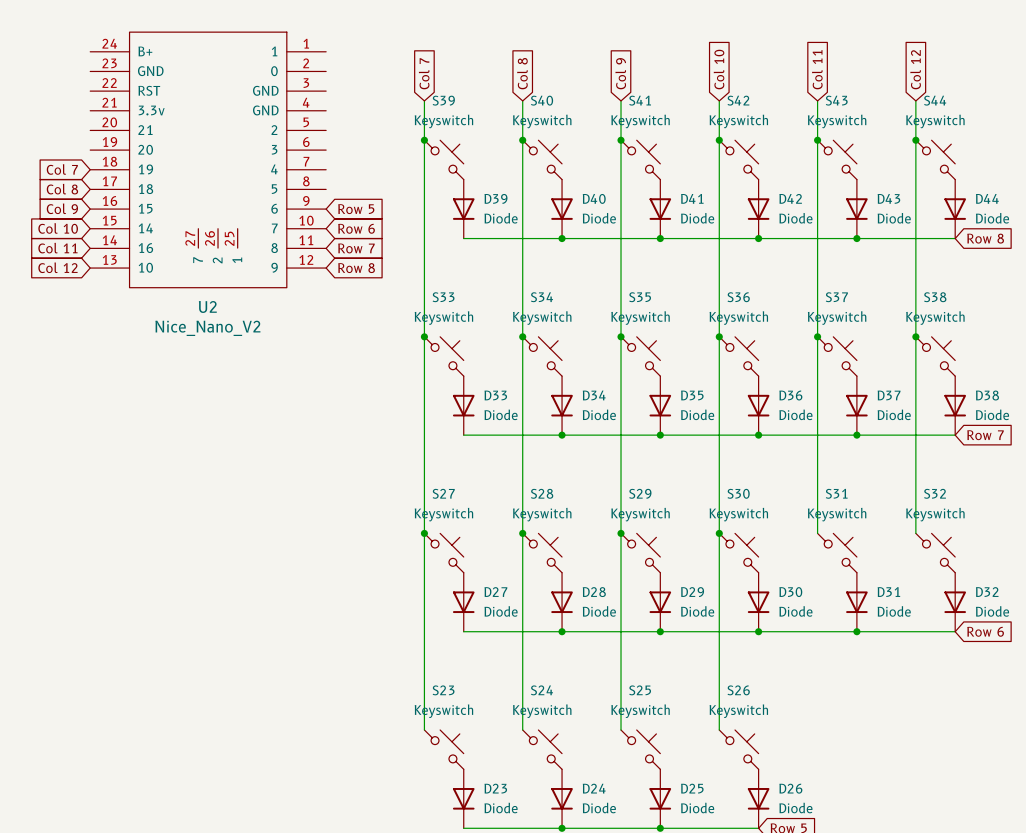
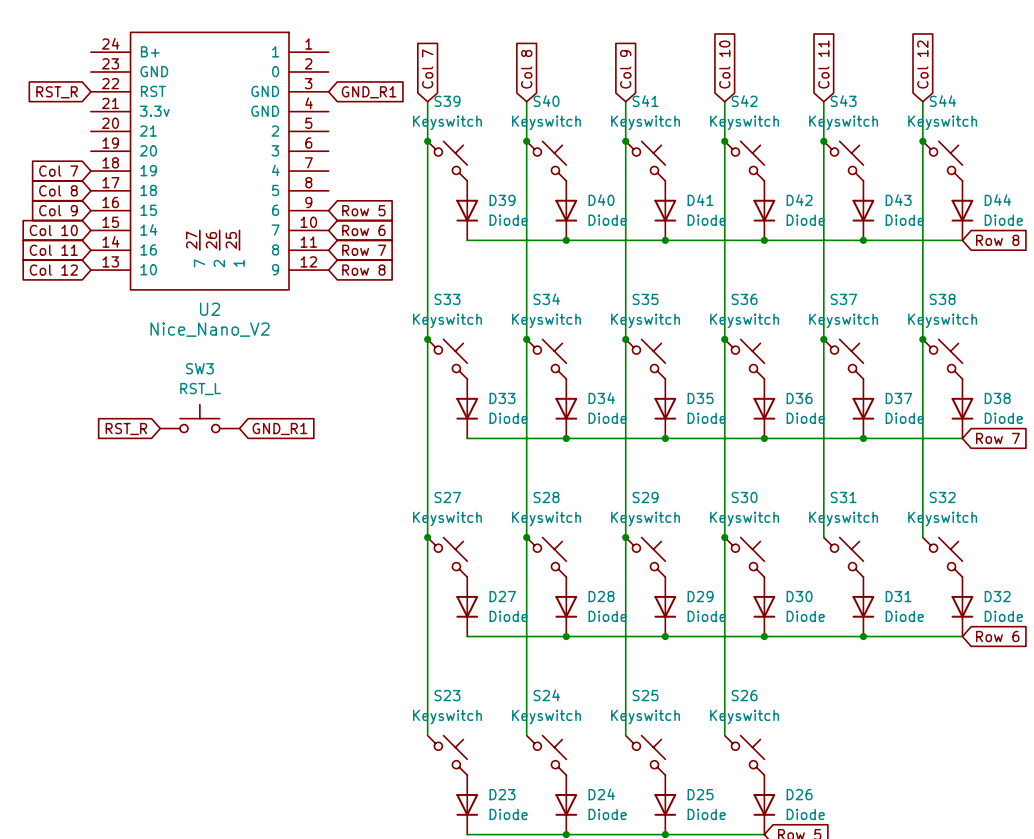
global label: none -> RST_R (57, 92)
global label: none -> GND_R1 (369, 92)
SW3: none -> RST_L (199, 418)
global label: none -> RST_R (126, 429)
global label: none -> GND_R1 (279, 429)

